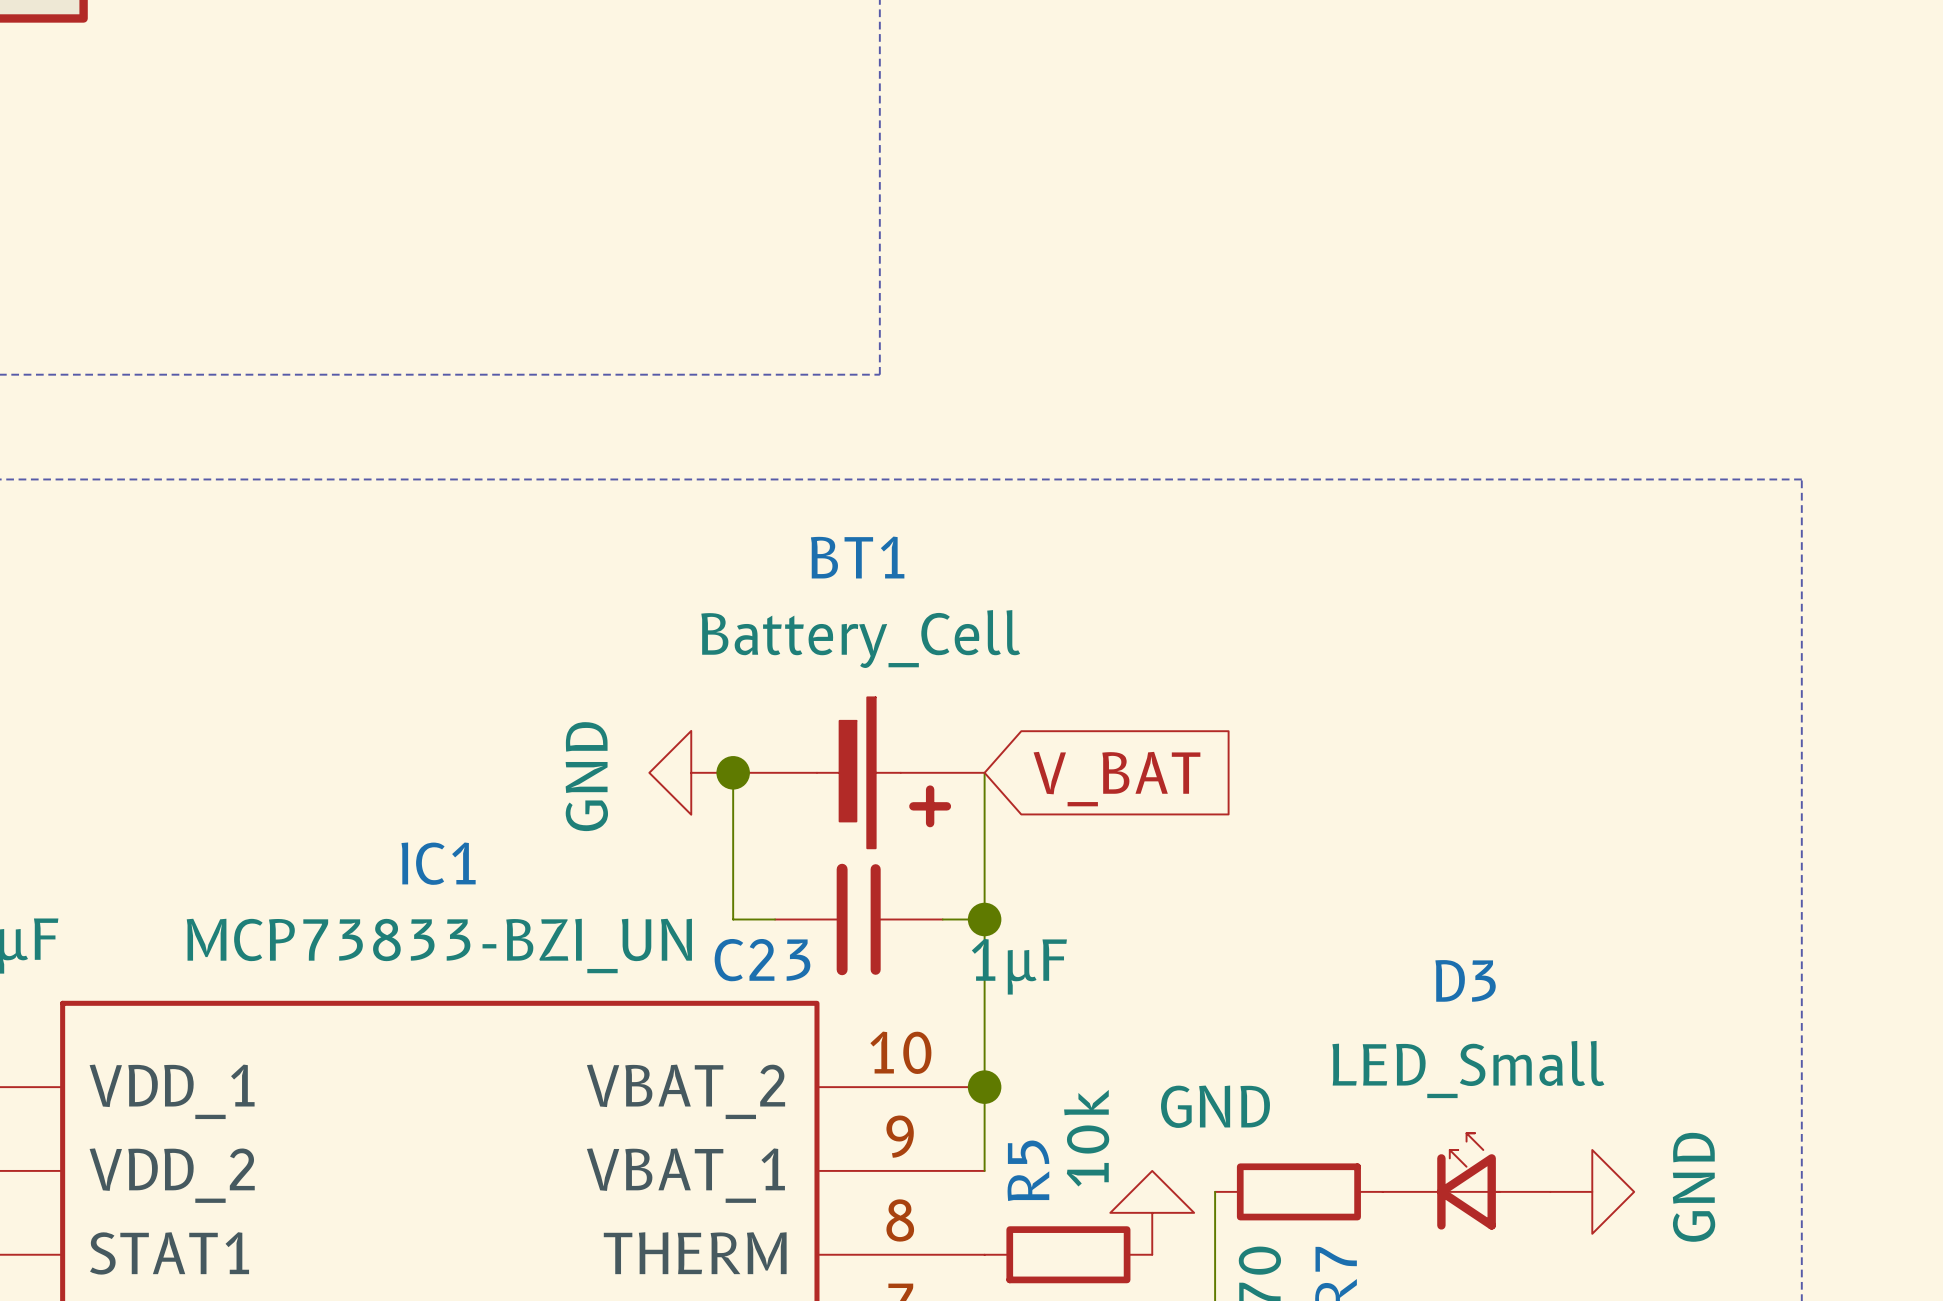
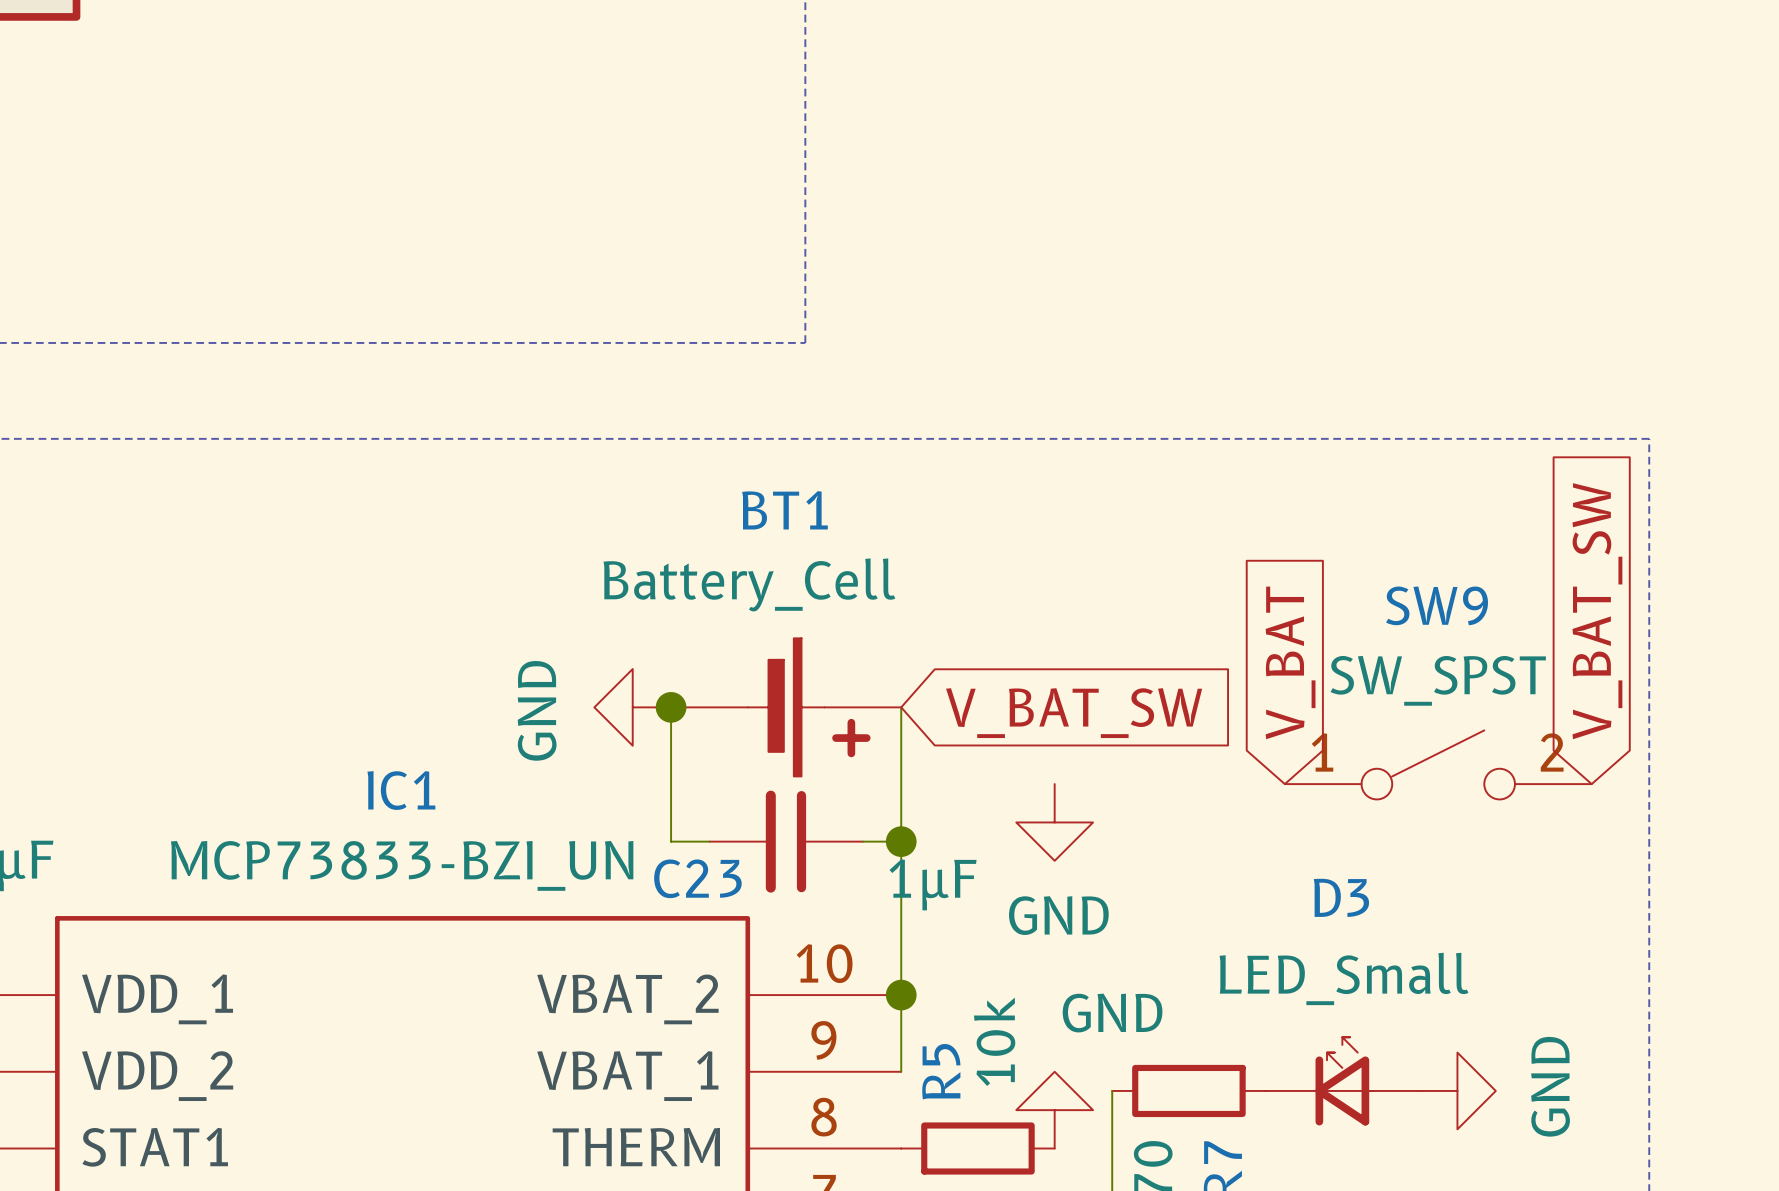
BT1 value position: Battery_Cell (860, 639) -> Battery_Cell (749, 584)
global label: none -> V_BAT_SW (1597, 611)
global label: none -> V_BAT (1290, 662)
global label: V_BAT (1116, 779) -> V_BAT_SW (1074, 713)
SW9: none -> SW_SPST (1438, 764)
power symbol: none -> GND (1054, 822)

